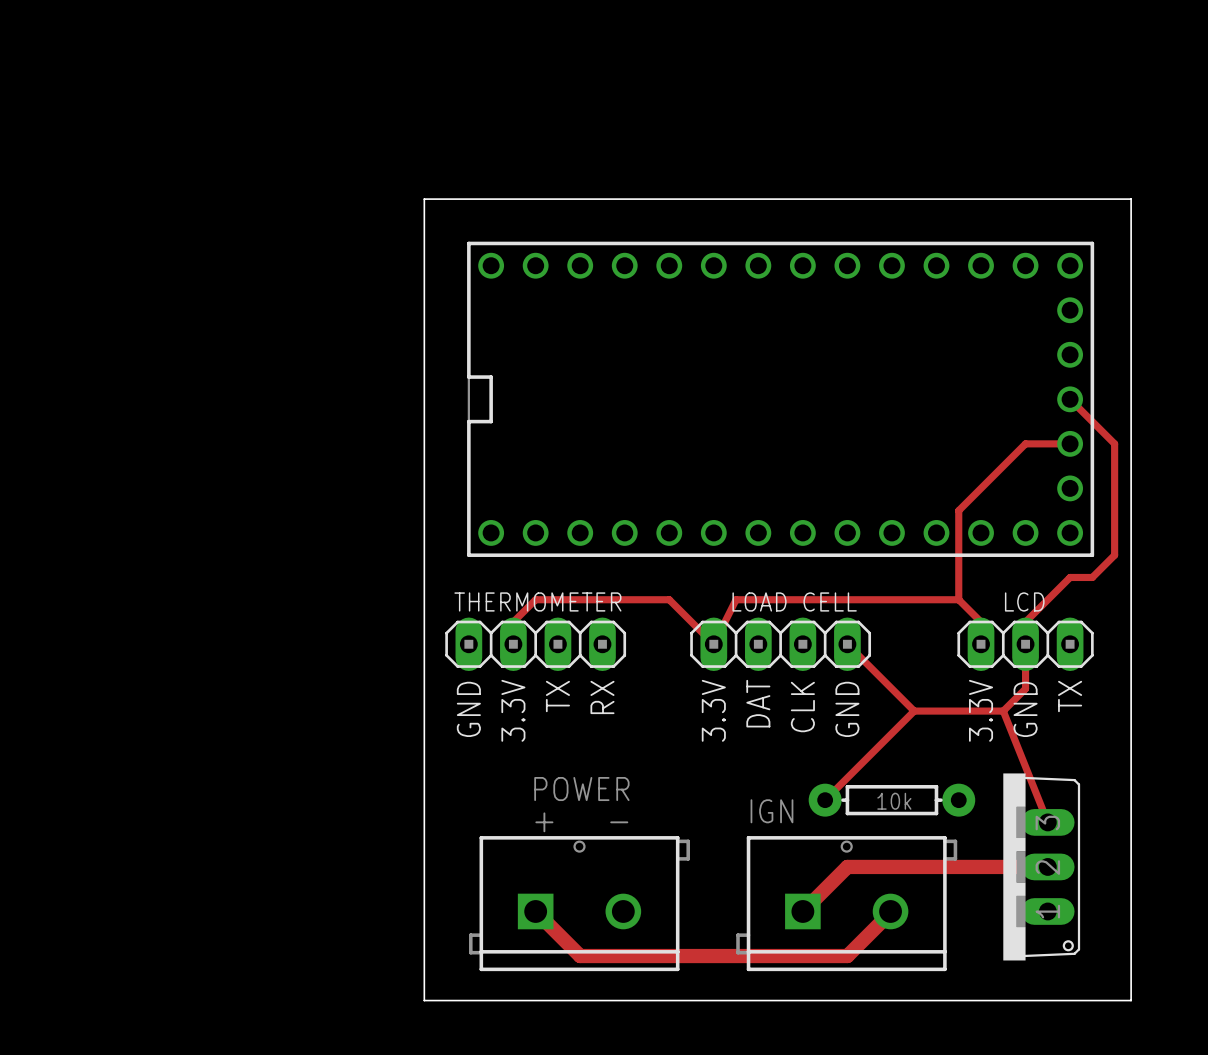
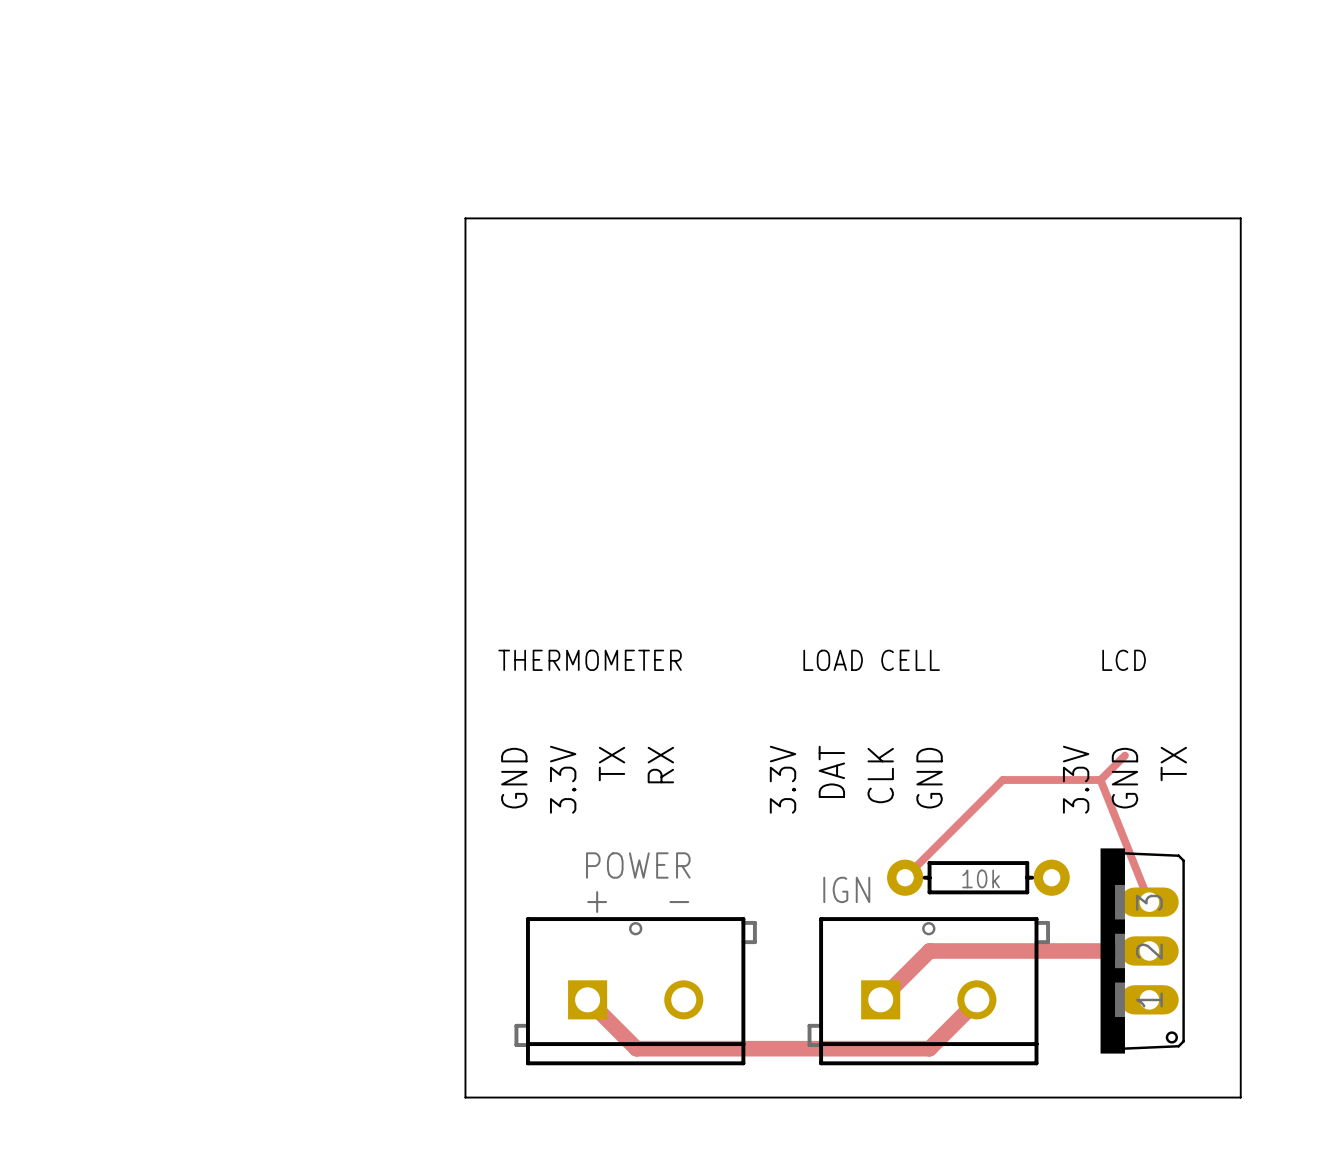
part: (780, 399) -> none
track: (1070, 399) (1114, 443) (1114, 555) (1092, 577) (1070, 577) (1025, 622) (1025, 688) -> none
track: (1070, 443) (1025, 443) (958, 510) (958, 599) -> none
track: (958, 599) (736, 599) (713, 644) (669, 599) (535, 599) (513, 622) (513, 644) -> none
track: (958, 599) (981, 622) (981, 644) -> none
part: (535, 644) -> none
part: (780, 644) -> none
track: (847, 644) (914, 711) -> none
part: (1025, 644) -> none

